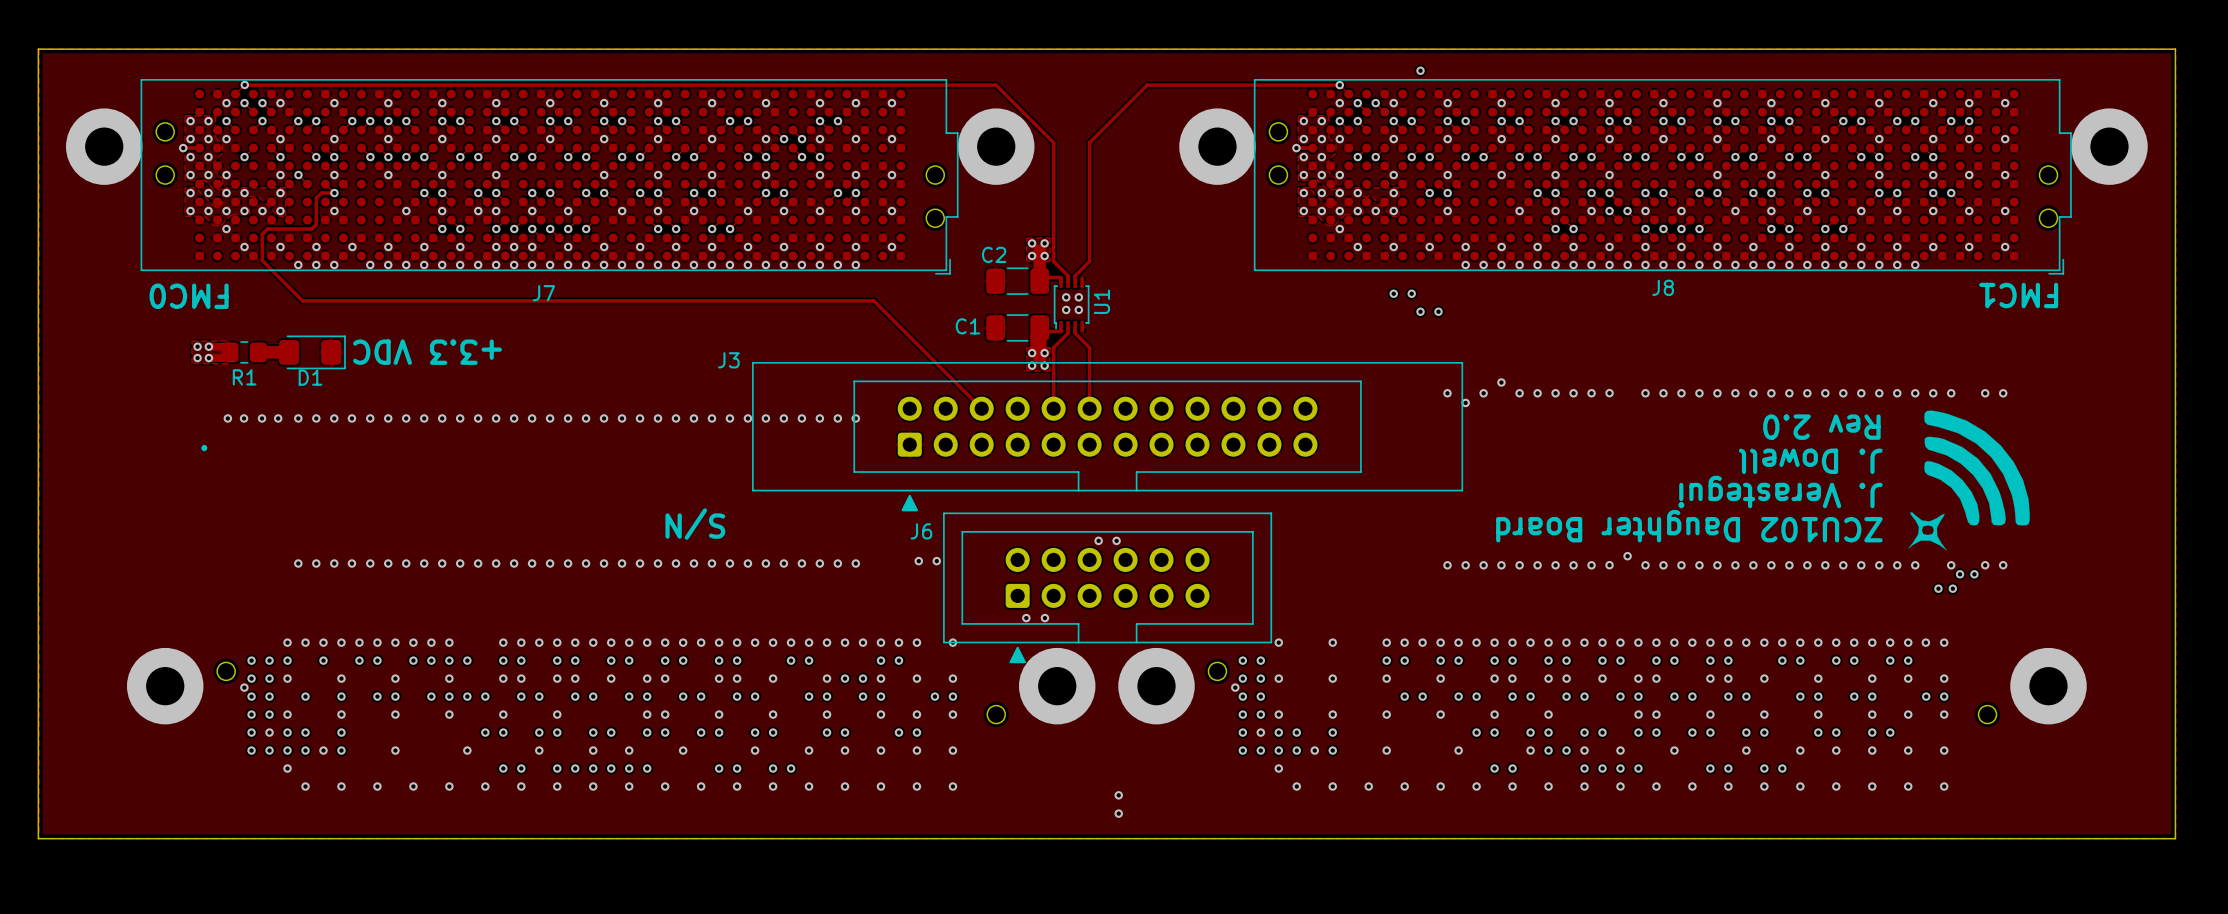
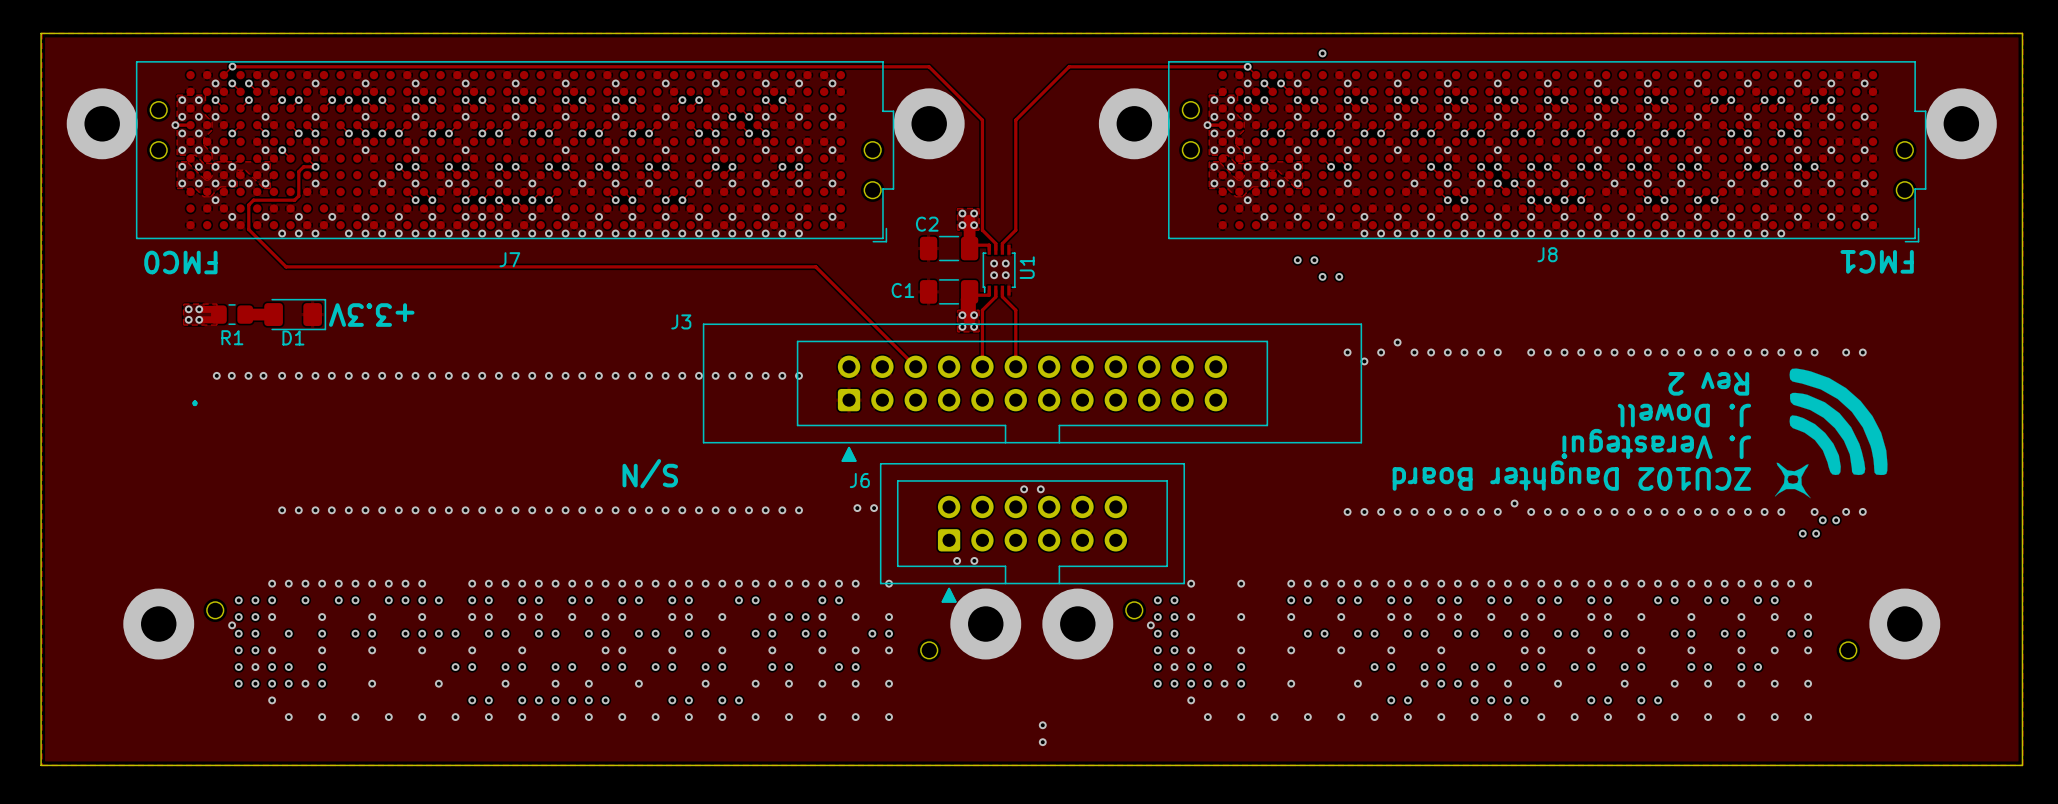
text: +3.3 VDC (427, 352) -> +3.3V (371, 315)
text: Rev 2.0 (1821, 427) -> Rev 2 (1708, 383)

